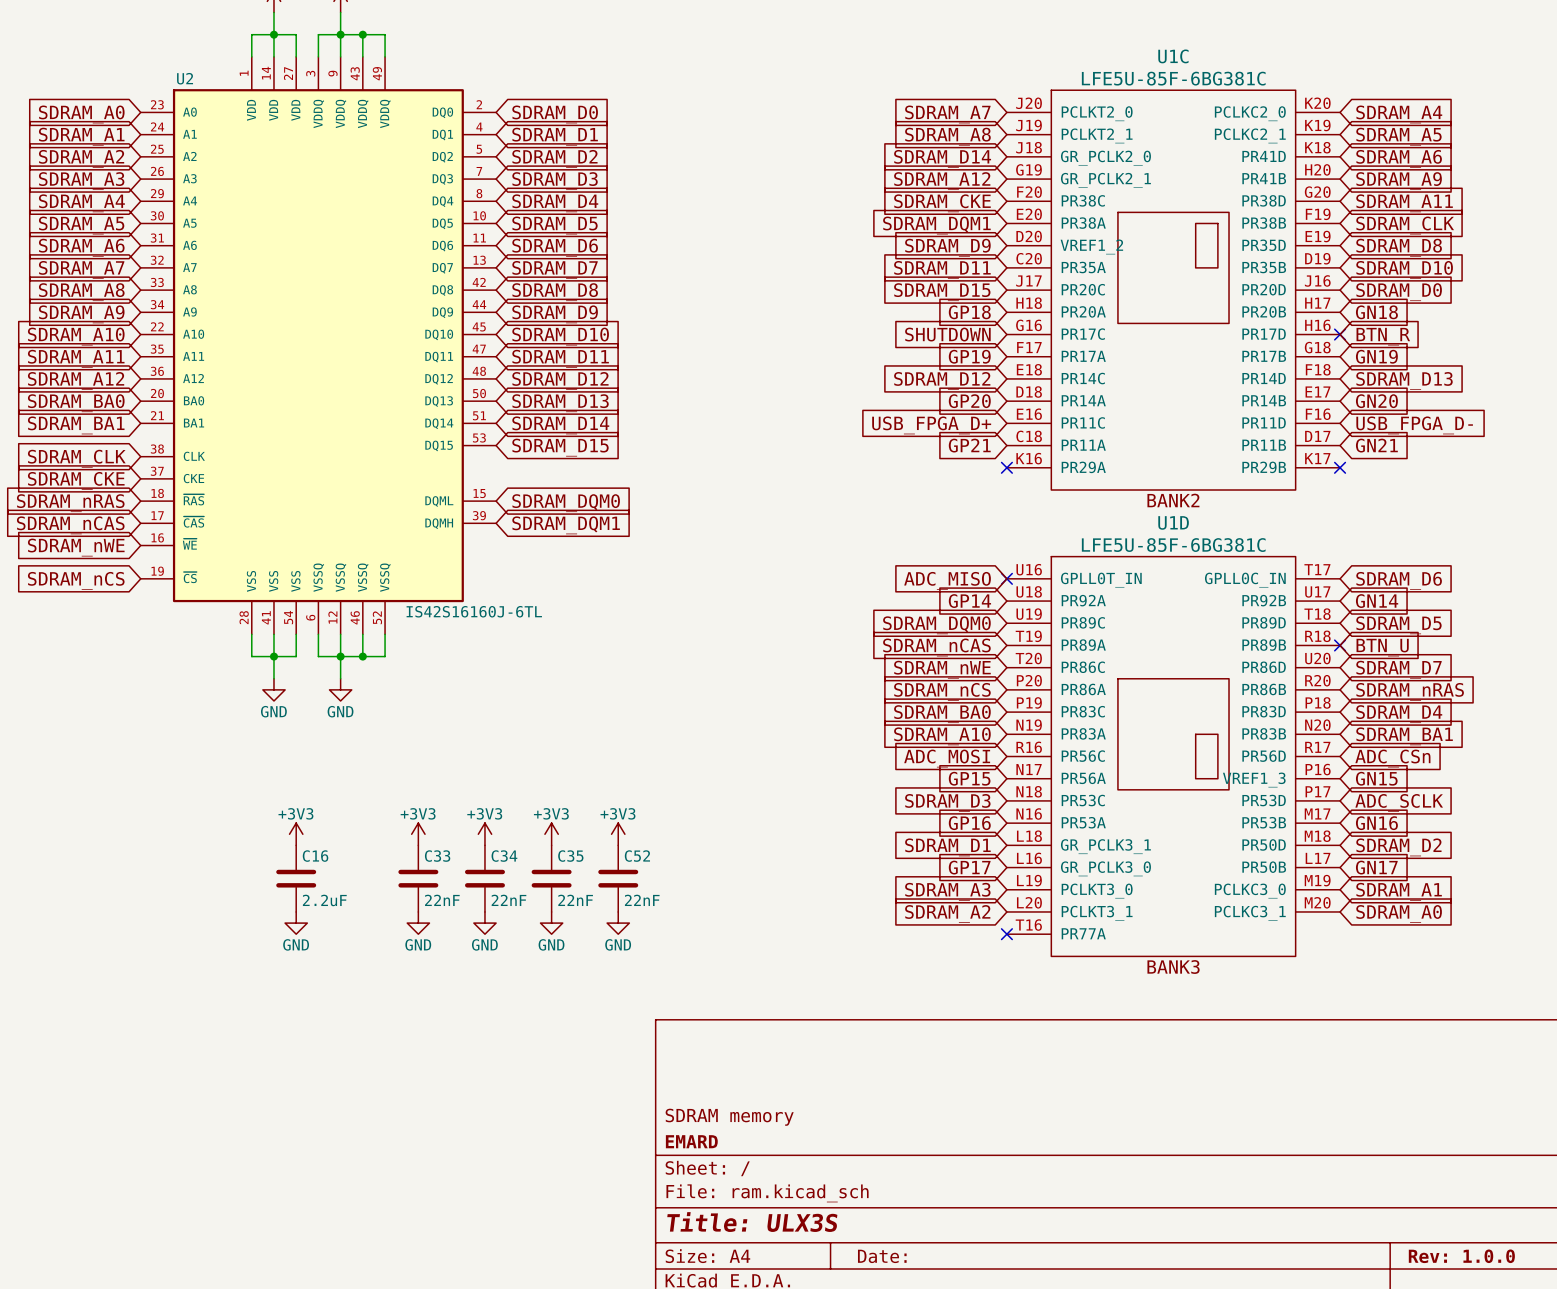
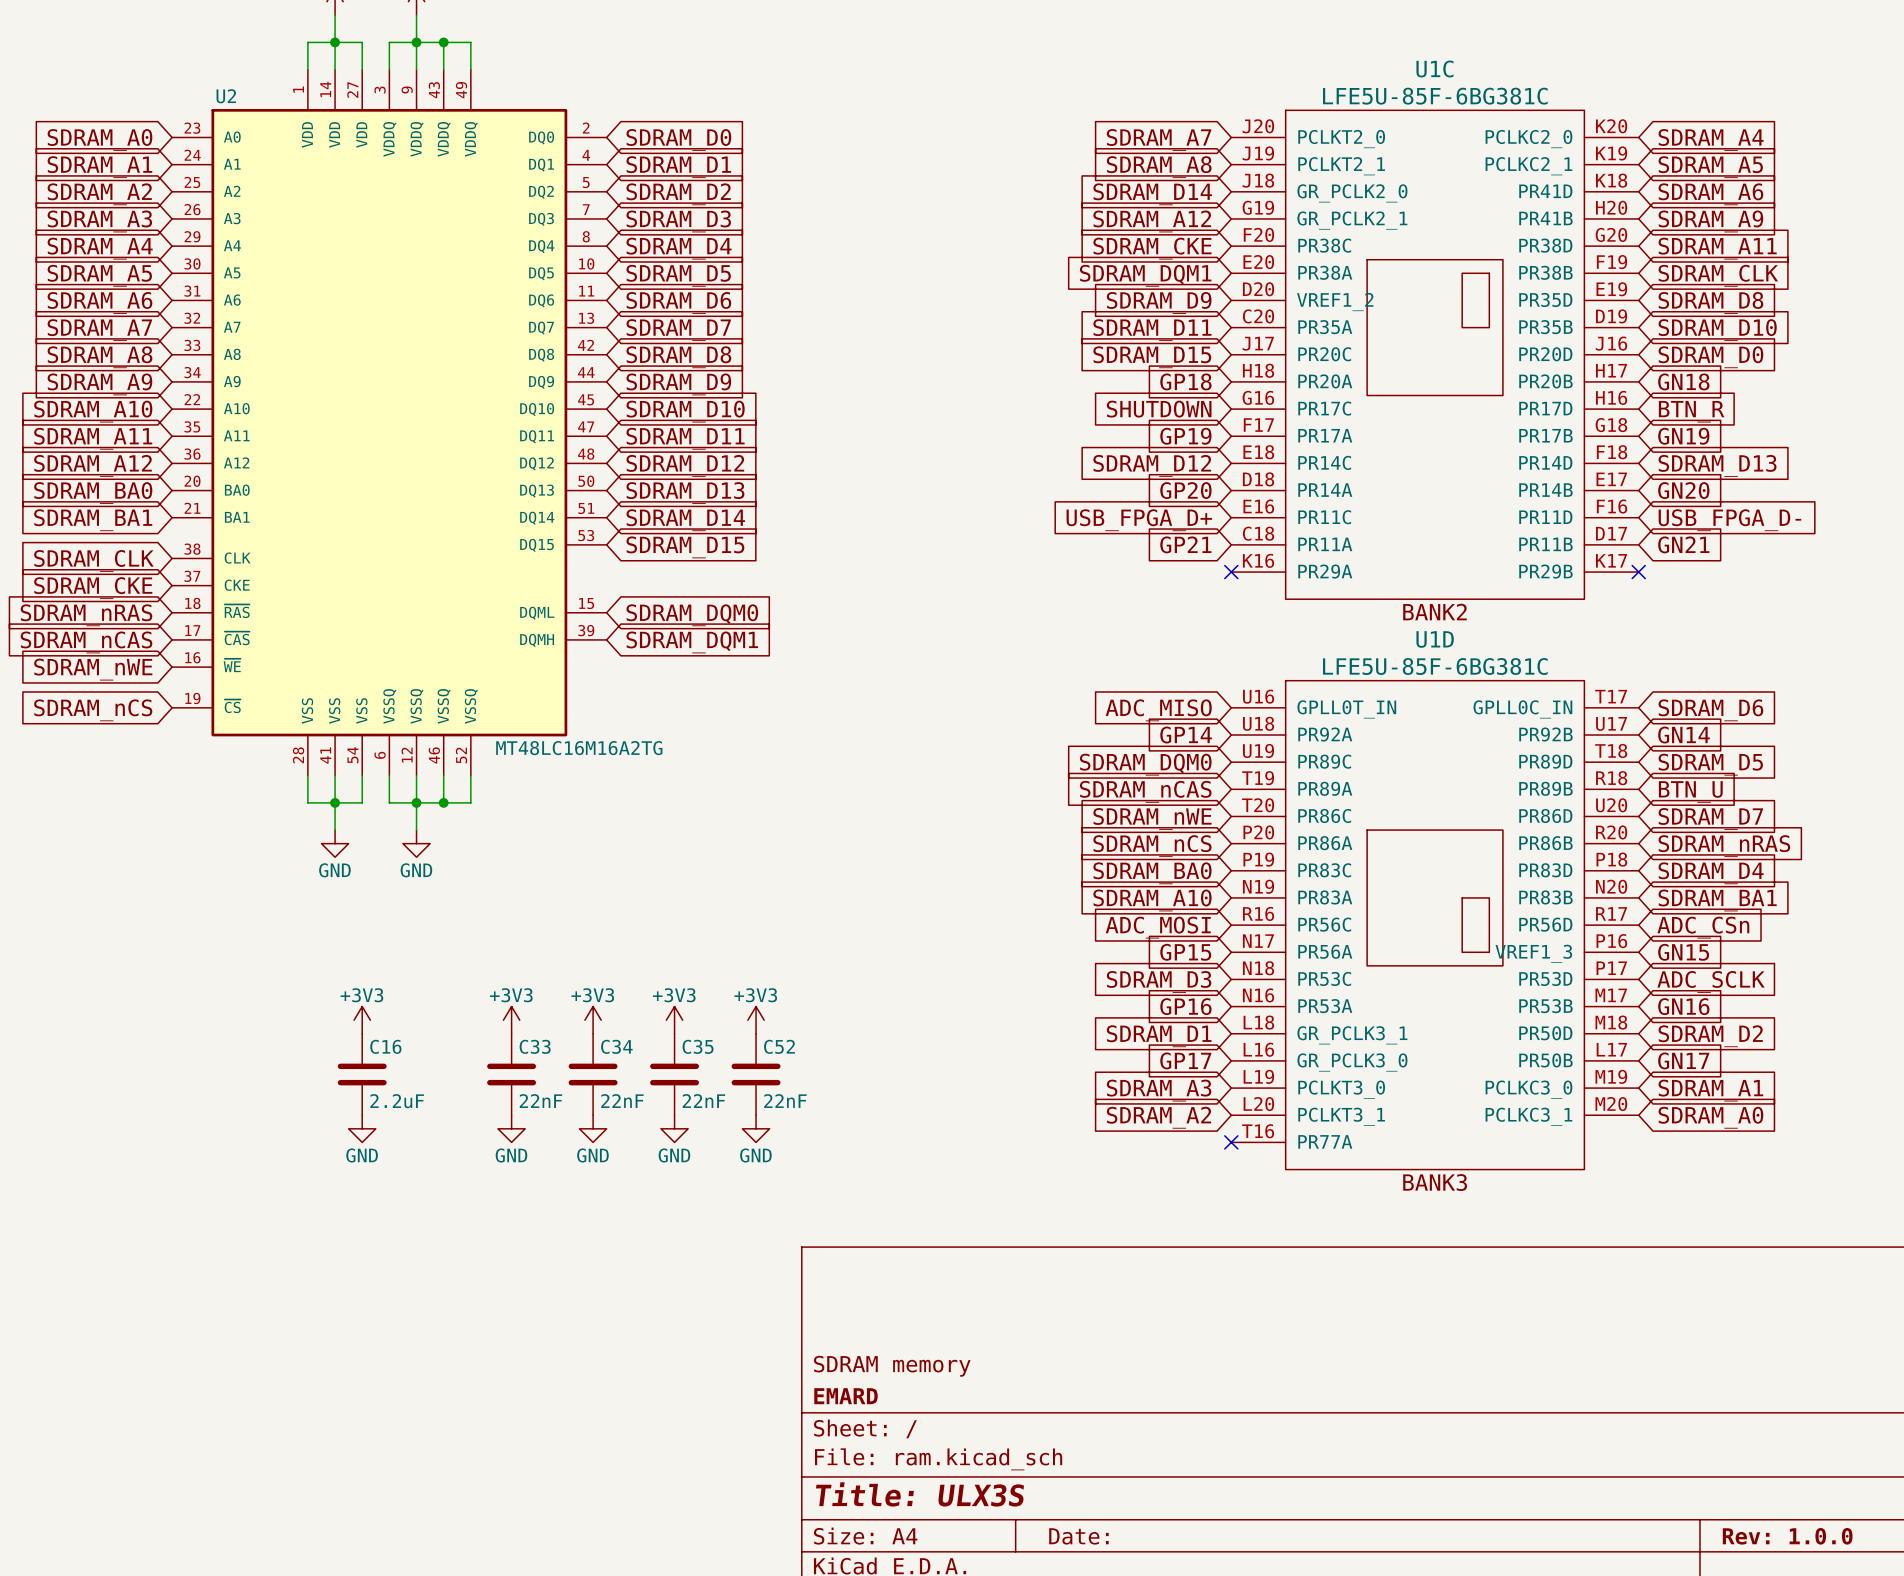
no-connect mark: (1340, 334) -> none
no-connect mark: (1006, 578) -> none
U2 value: IS42S16160J-6TL (474, 611) -> MT48LC16M16A2TG (579, 748)
no-connect mark: (1340, 645) -> none

